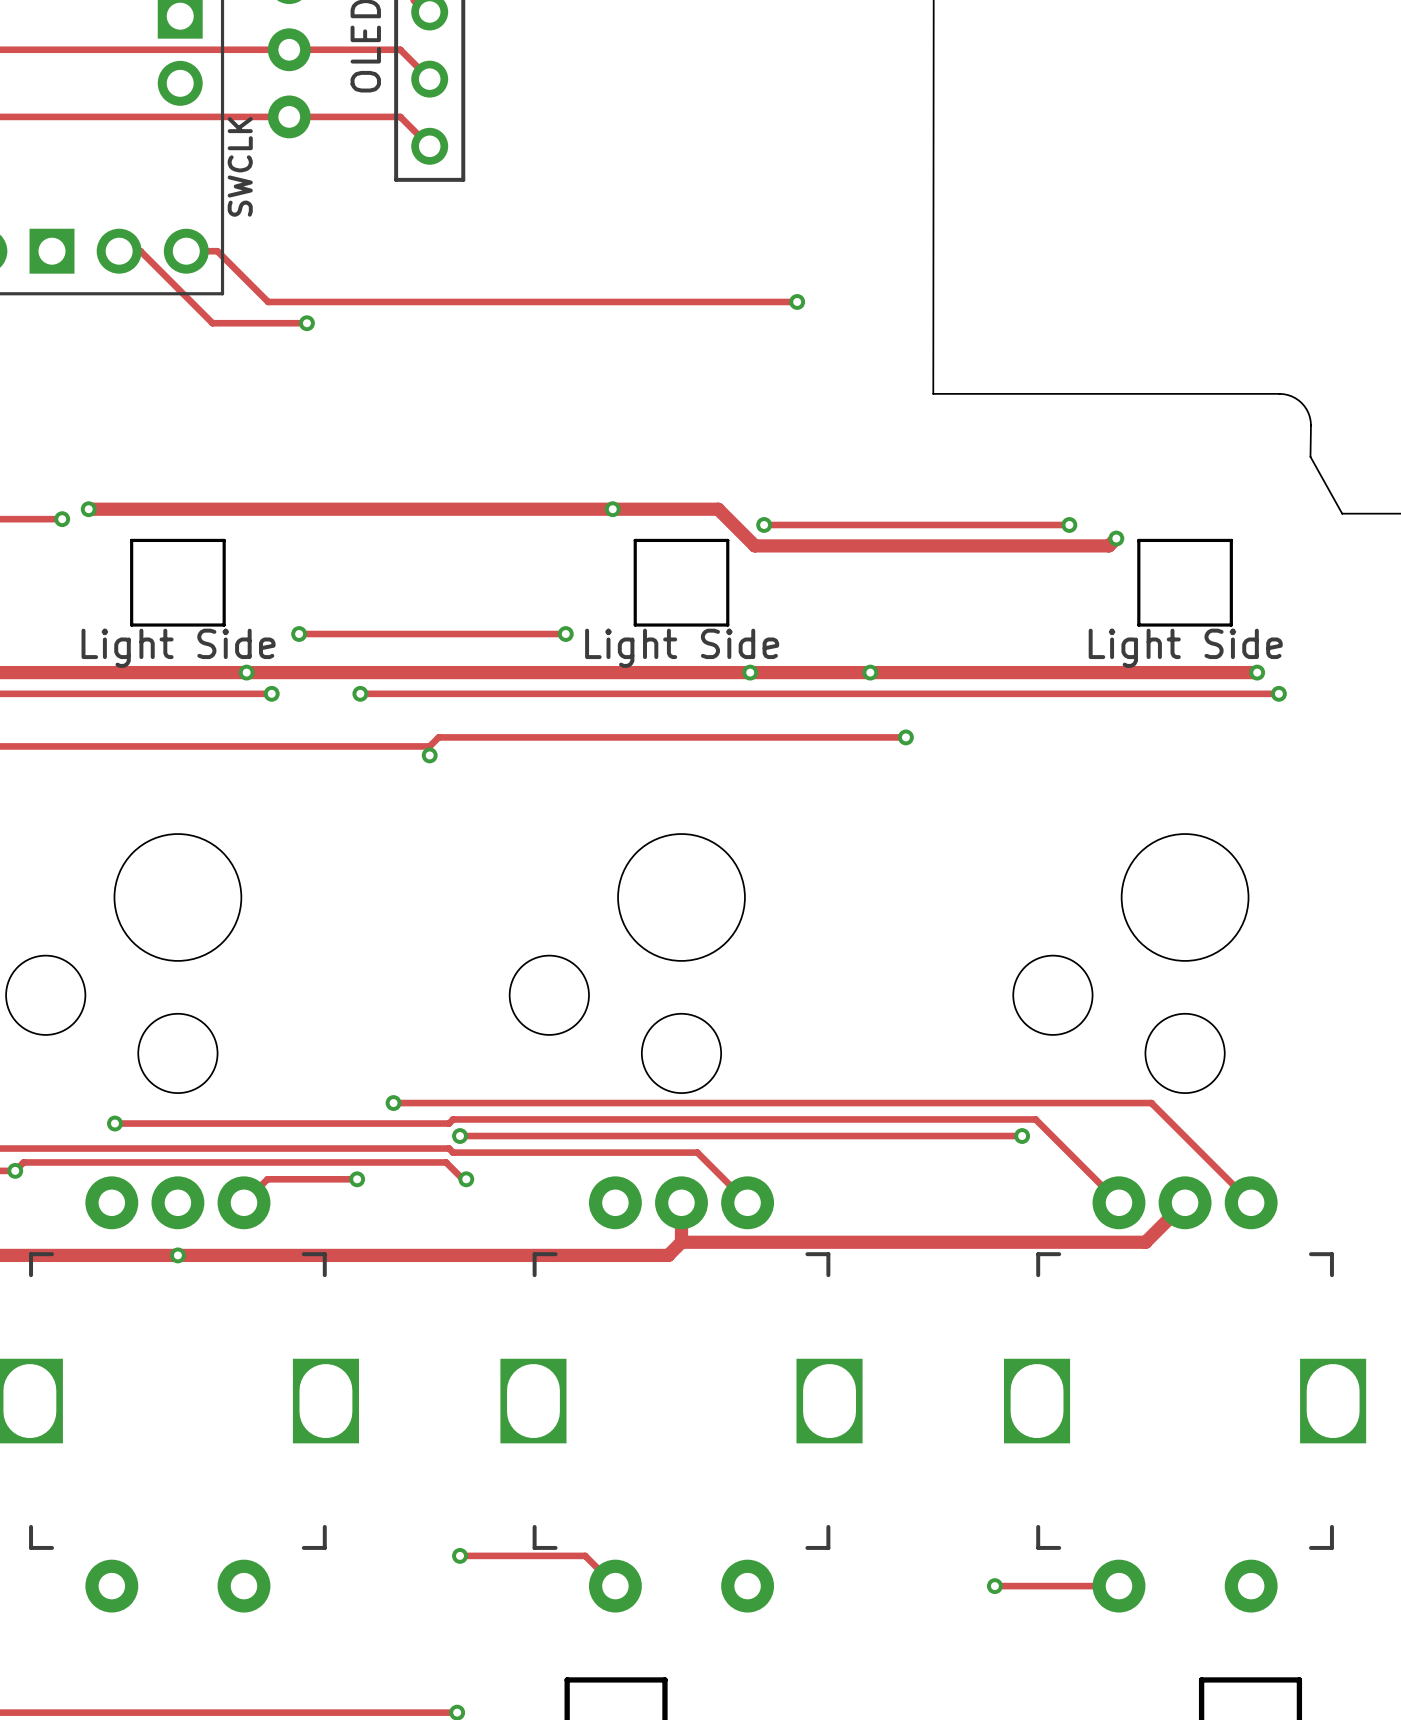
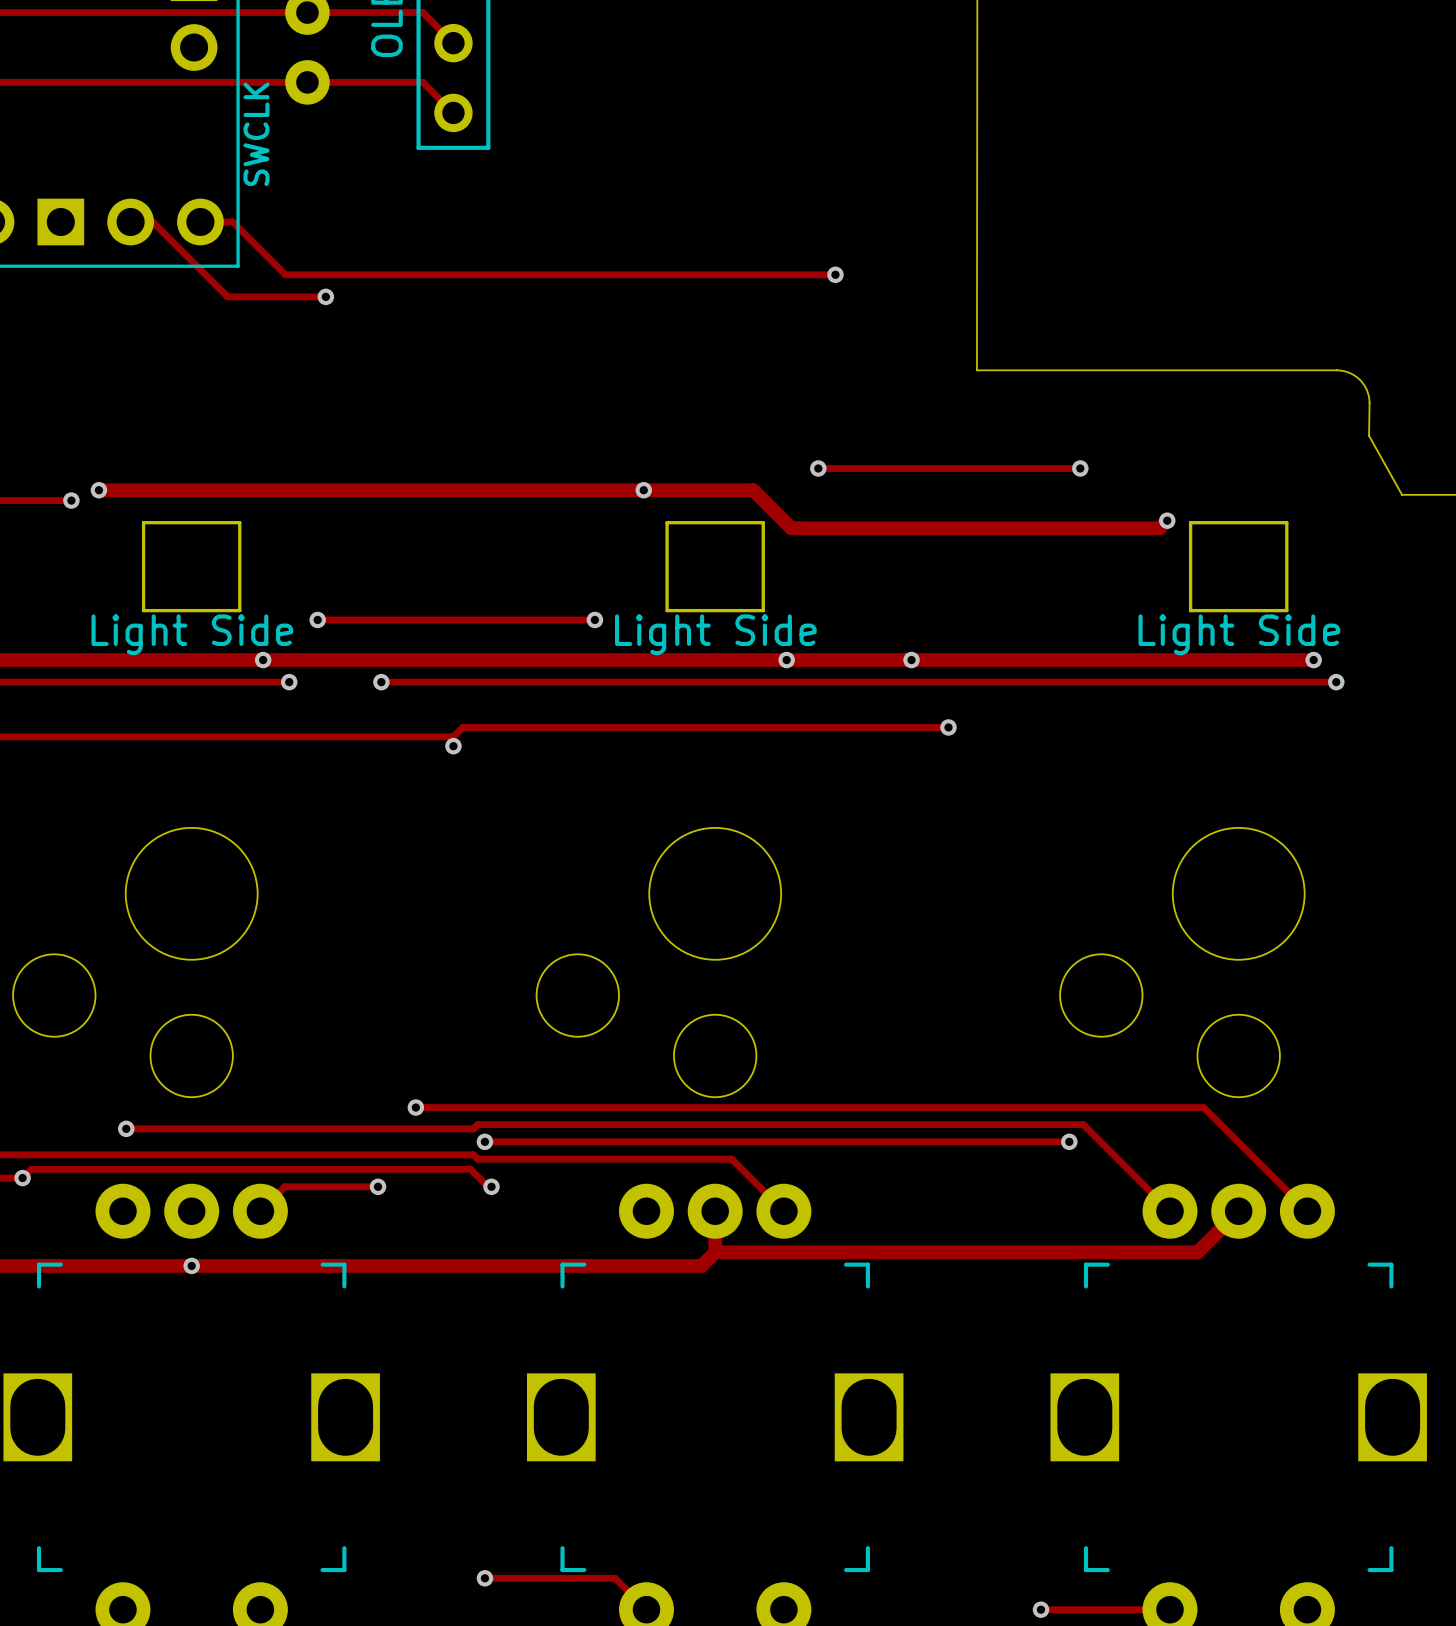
track: none -> (818, 468) (1080, 468)
track: (764, 524) (1069, 524) -> none
via position: (764, 524) -> (818, 468)
via position: (1069, 524) -> (1080, 468)

